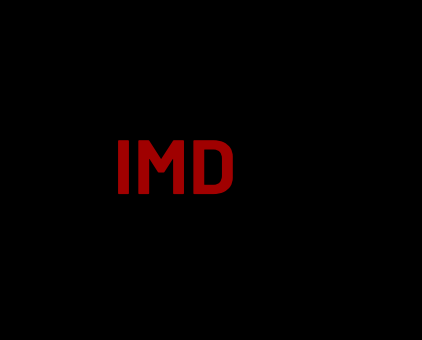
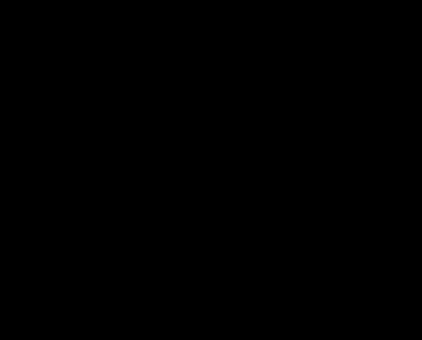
text: IMD (175, 167) -> none

